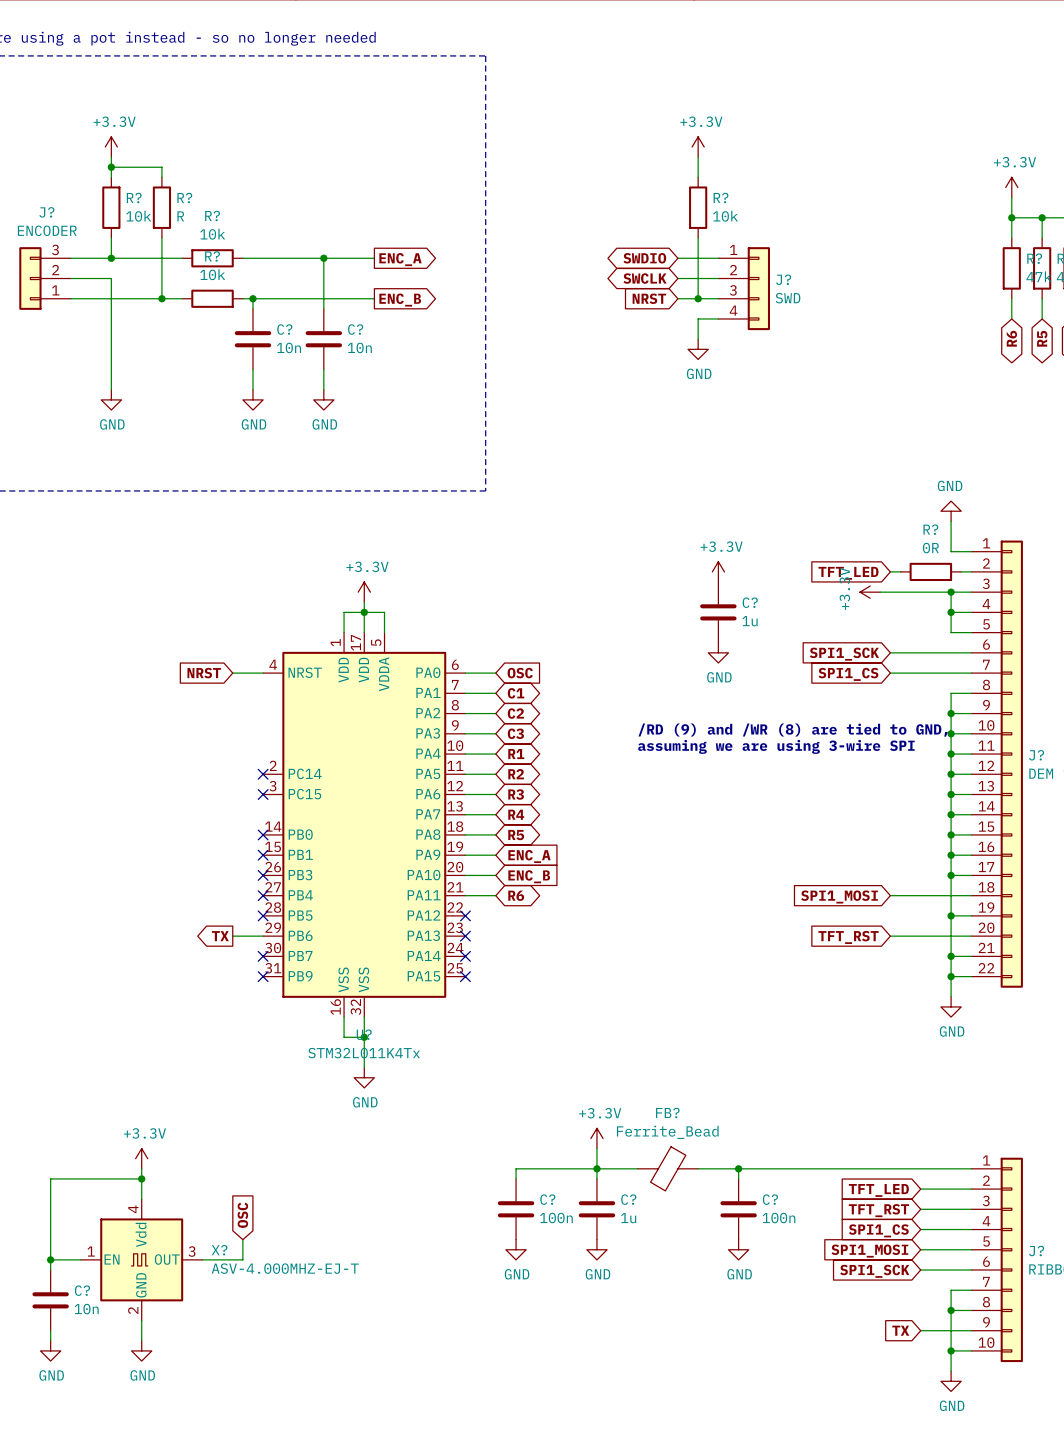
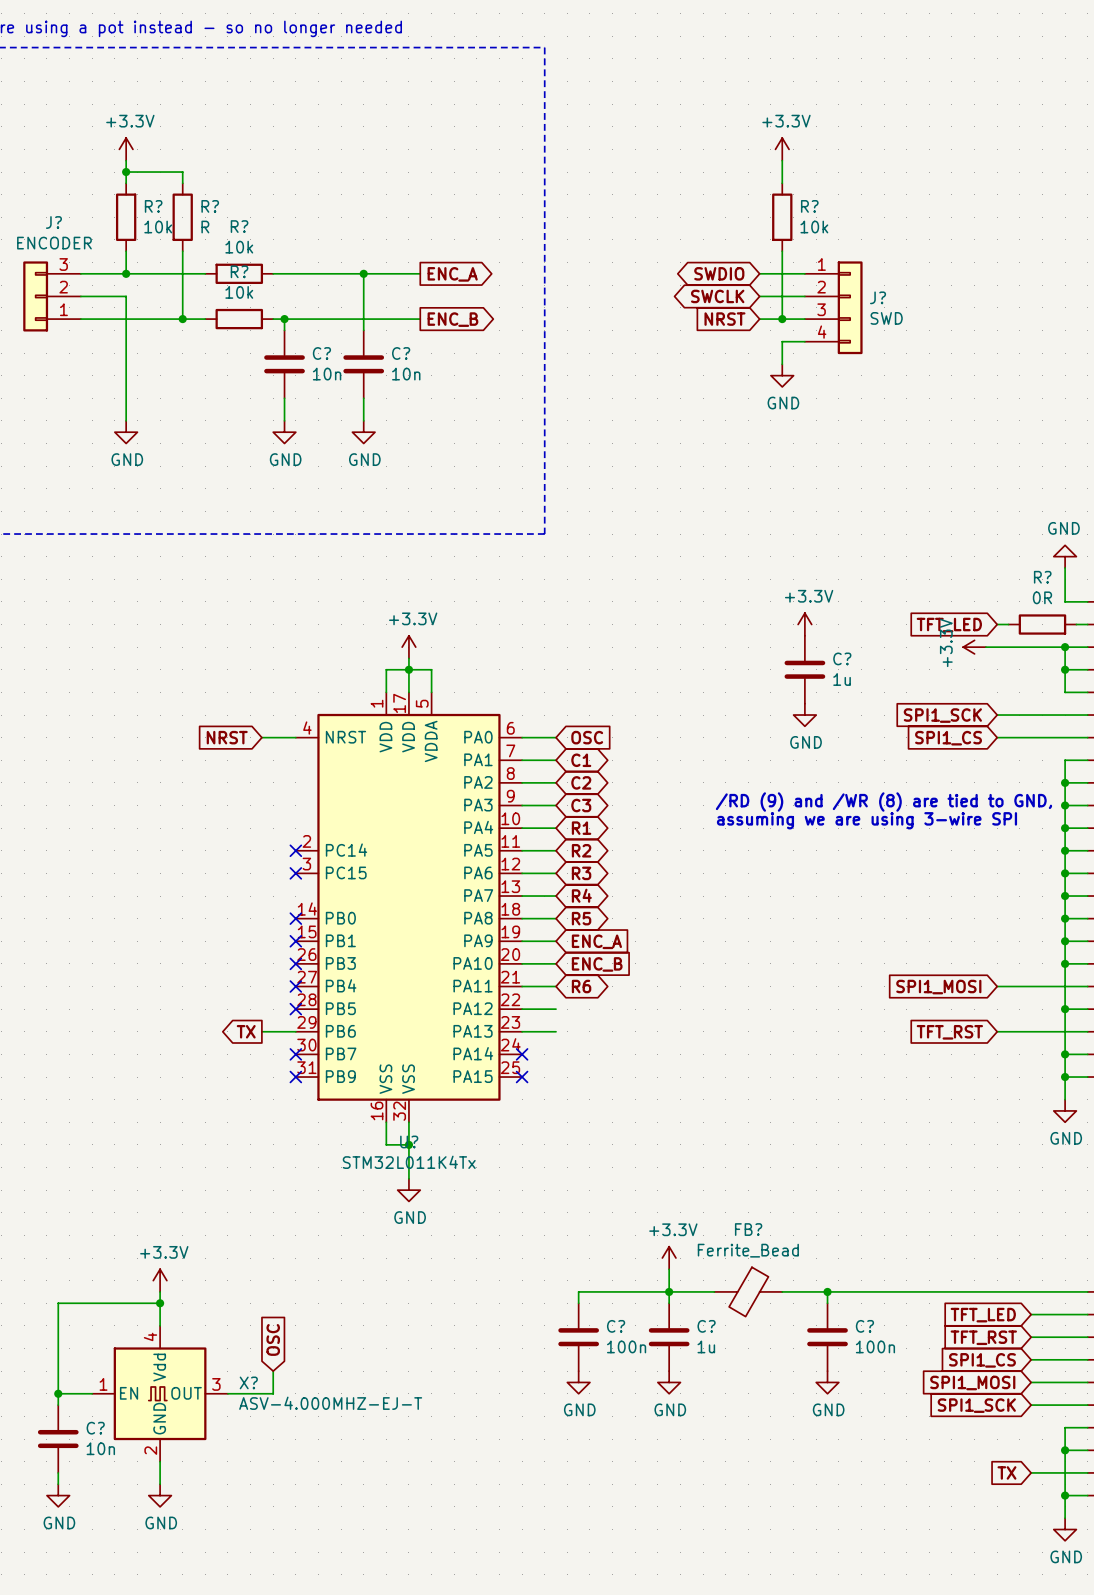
wire: none -> (522, 1009) (556, 1009)
no-connect mark: (465, 915) -> none
wire: none -> (522, 1031) (556, 1031)
no-connect mark: (465, 936) -> none

